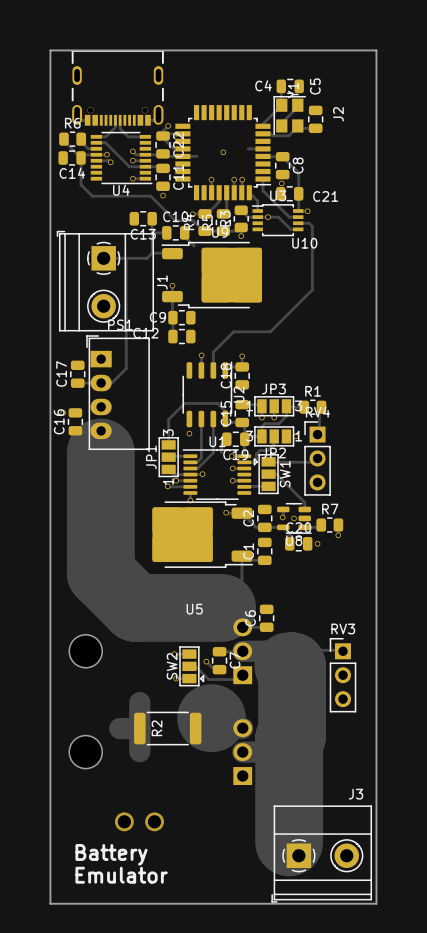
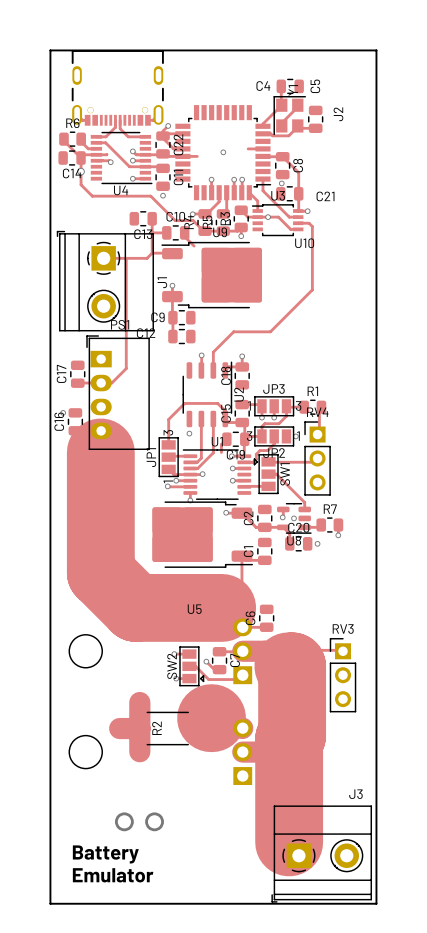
via: (106, 154) -> none
via: none -> (81, 171)

